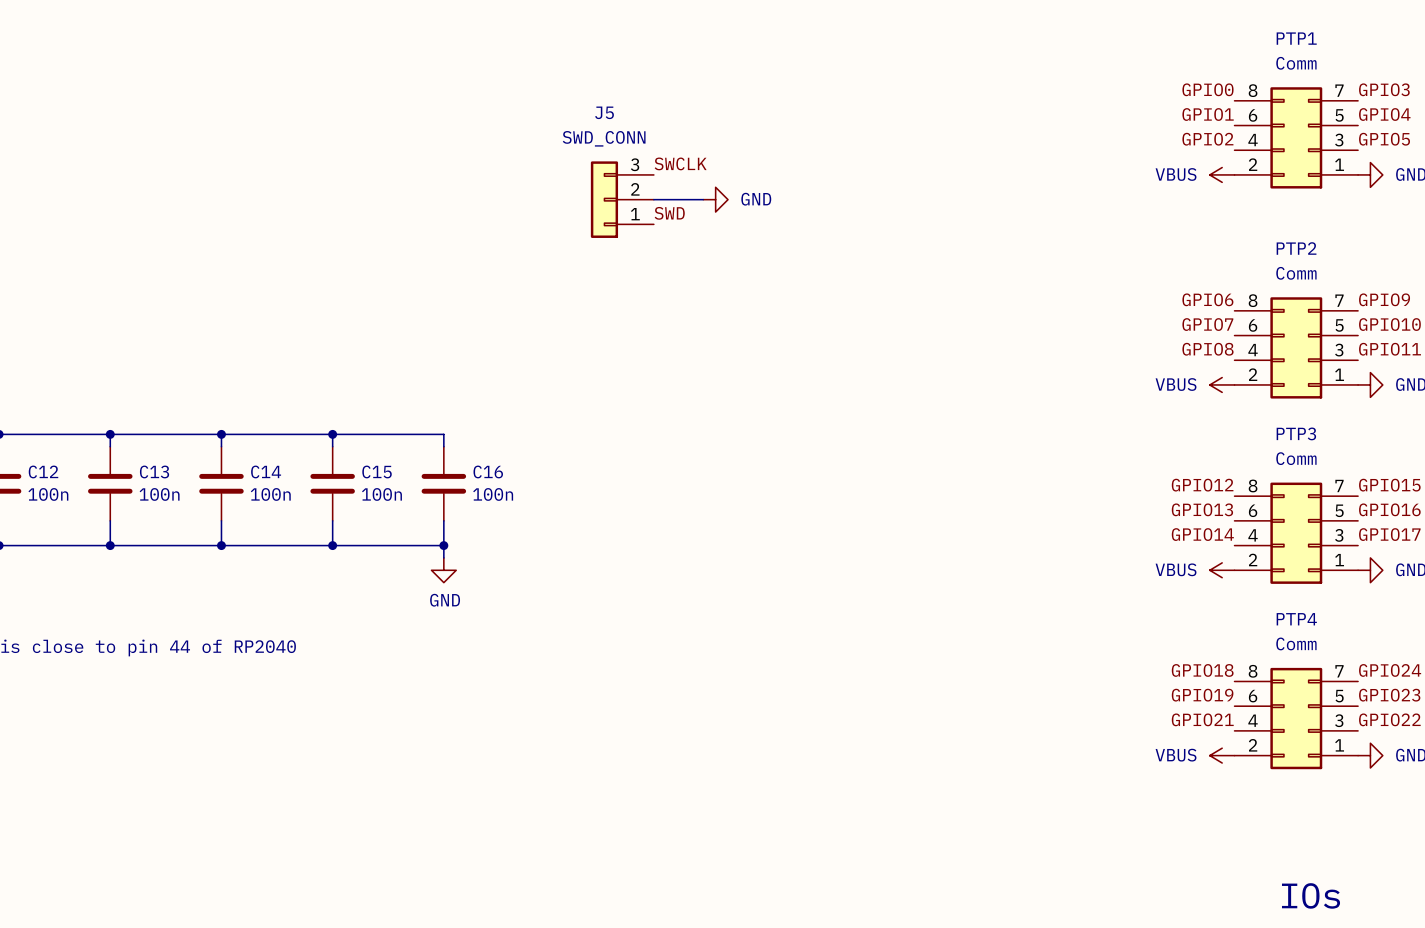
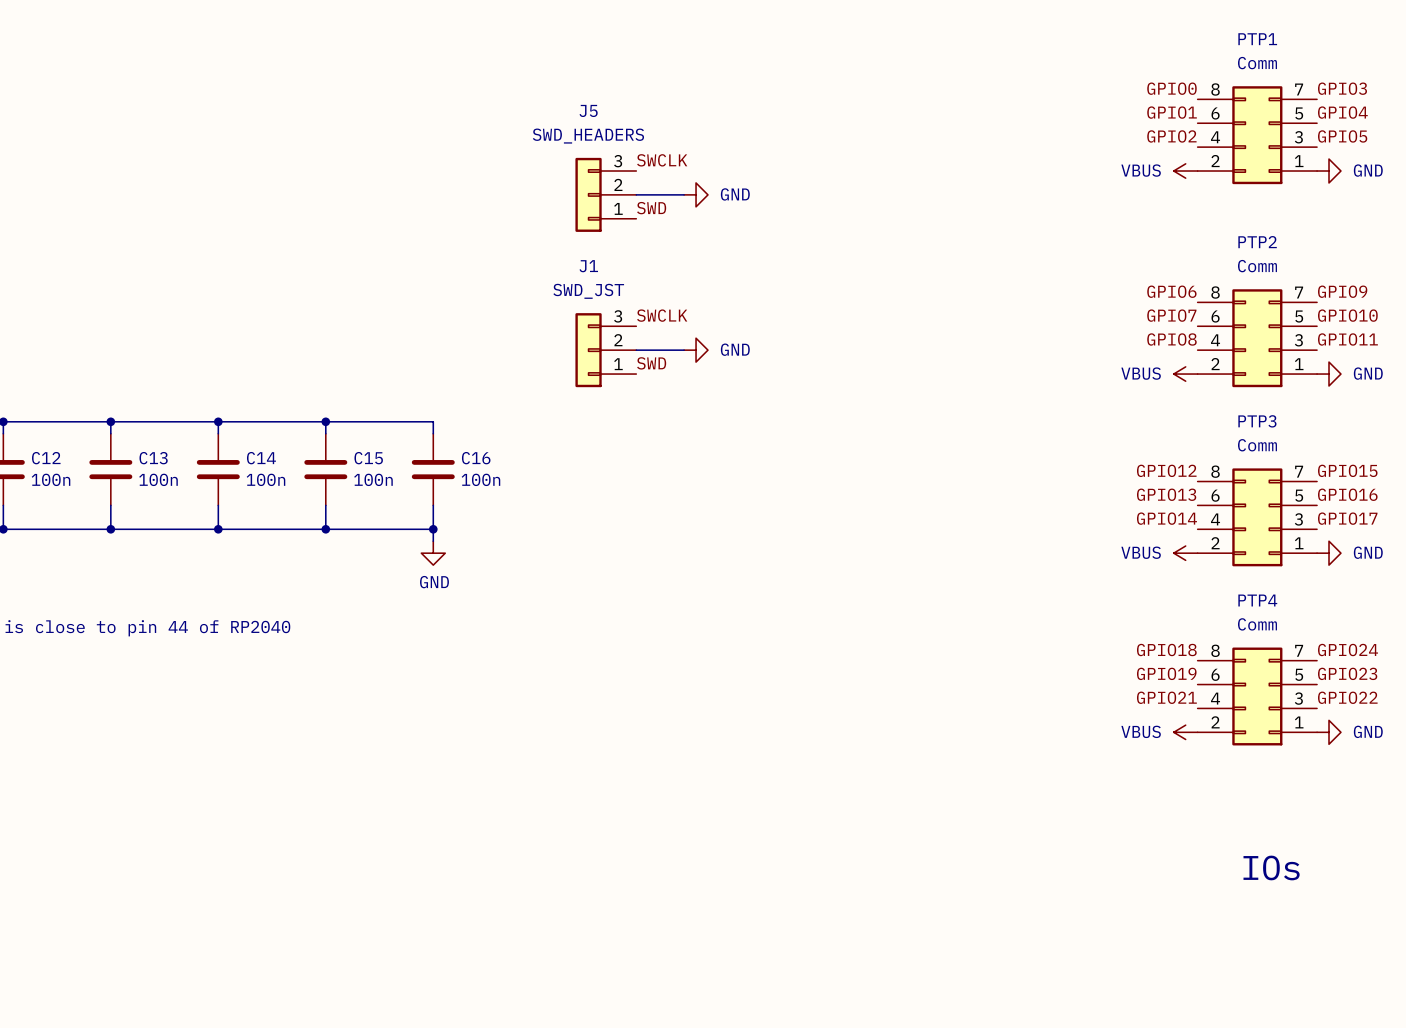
J5 value: SWD_CONN (604, 138) -> SWD_HEADERS (588, 136)
label: none -> SWCLK (662, 315)
J1: none -> SWD_JST (605, 350)
wire: none -> (636, 350) (684, 350)
power symbol: none -> GND (696, 350)
label: none -> SWD (651, 363)

